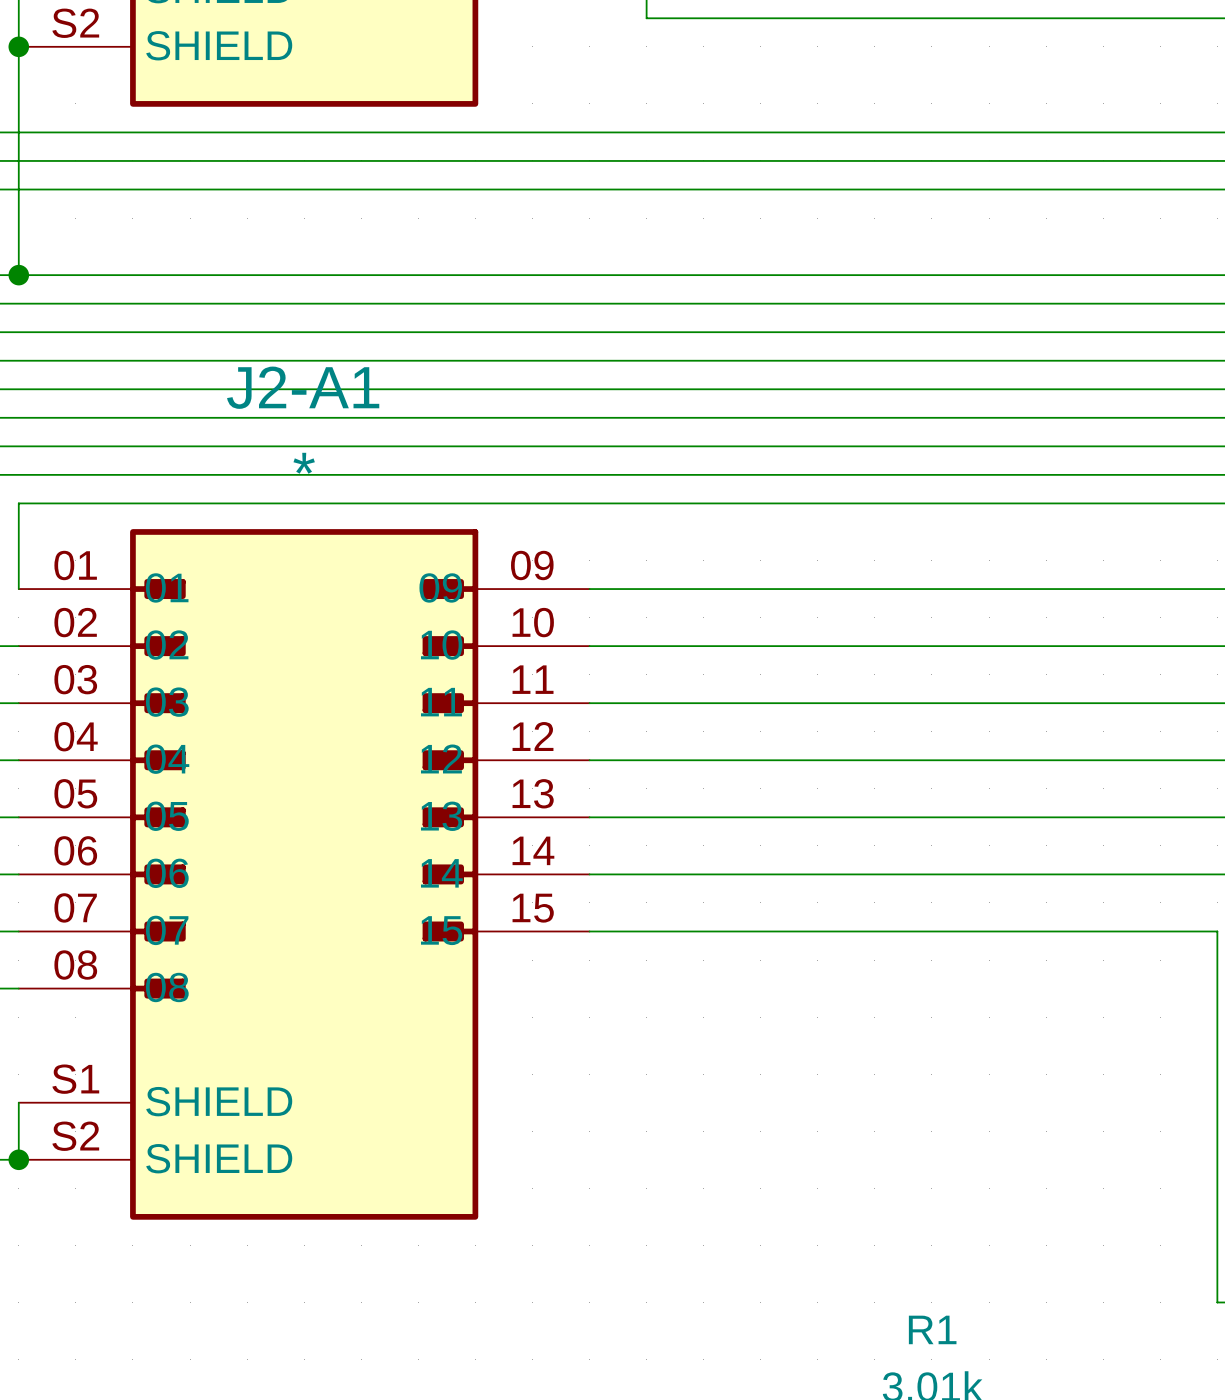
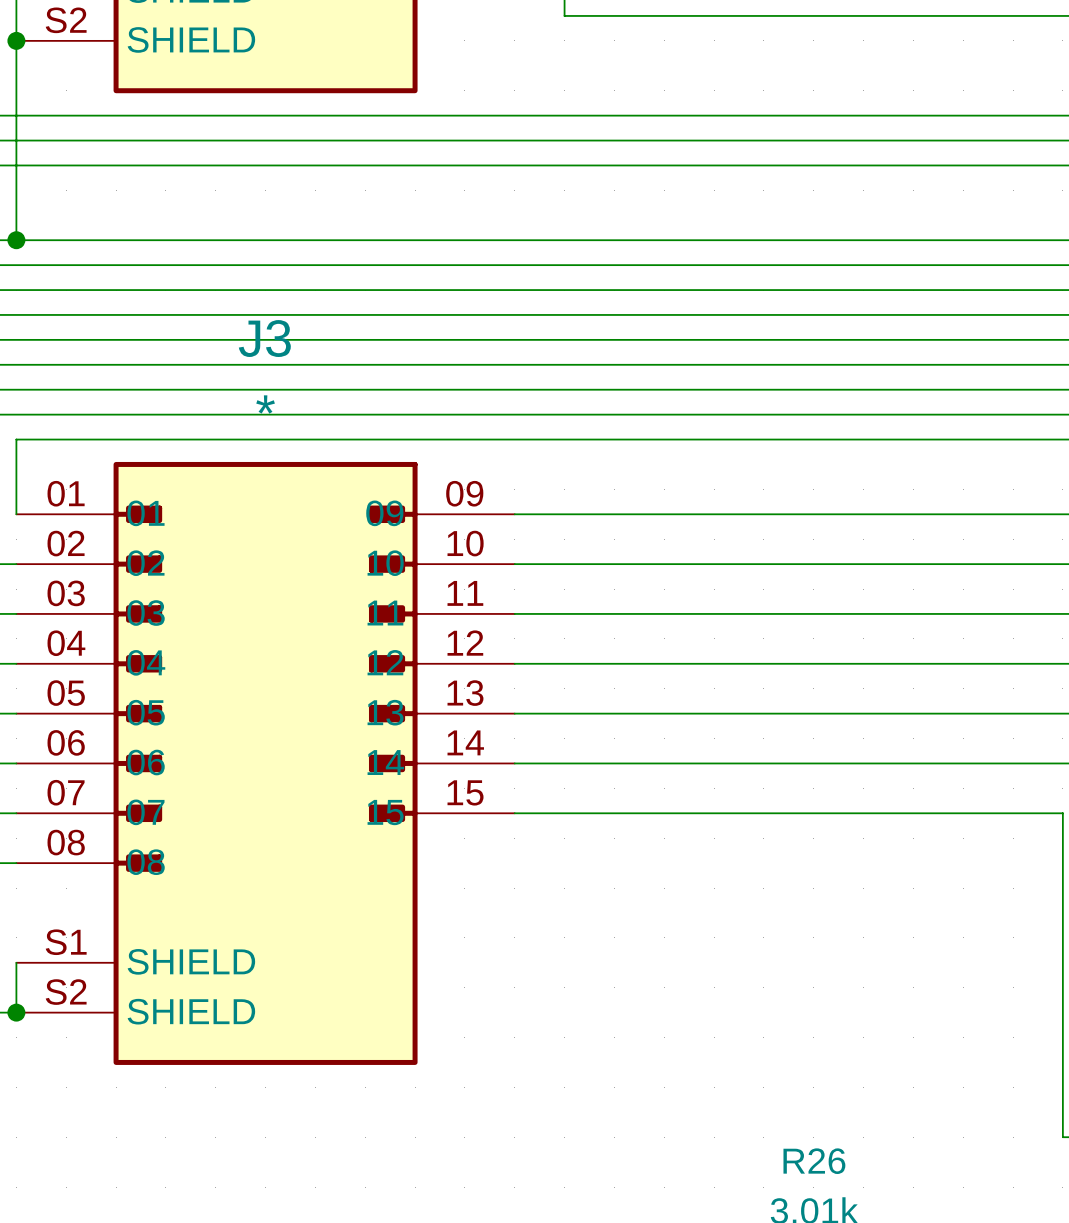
J2-A1 name: J2-A1 (303, 387) -> J3 (264, 338)
R1 name: R1 (932, 1329) -> R26 (814, 1161)

